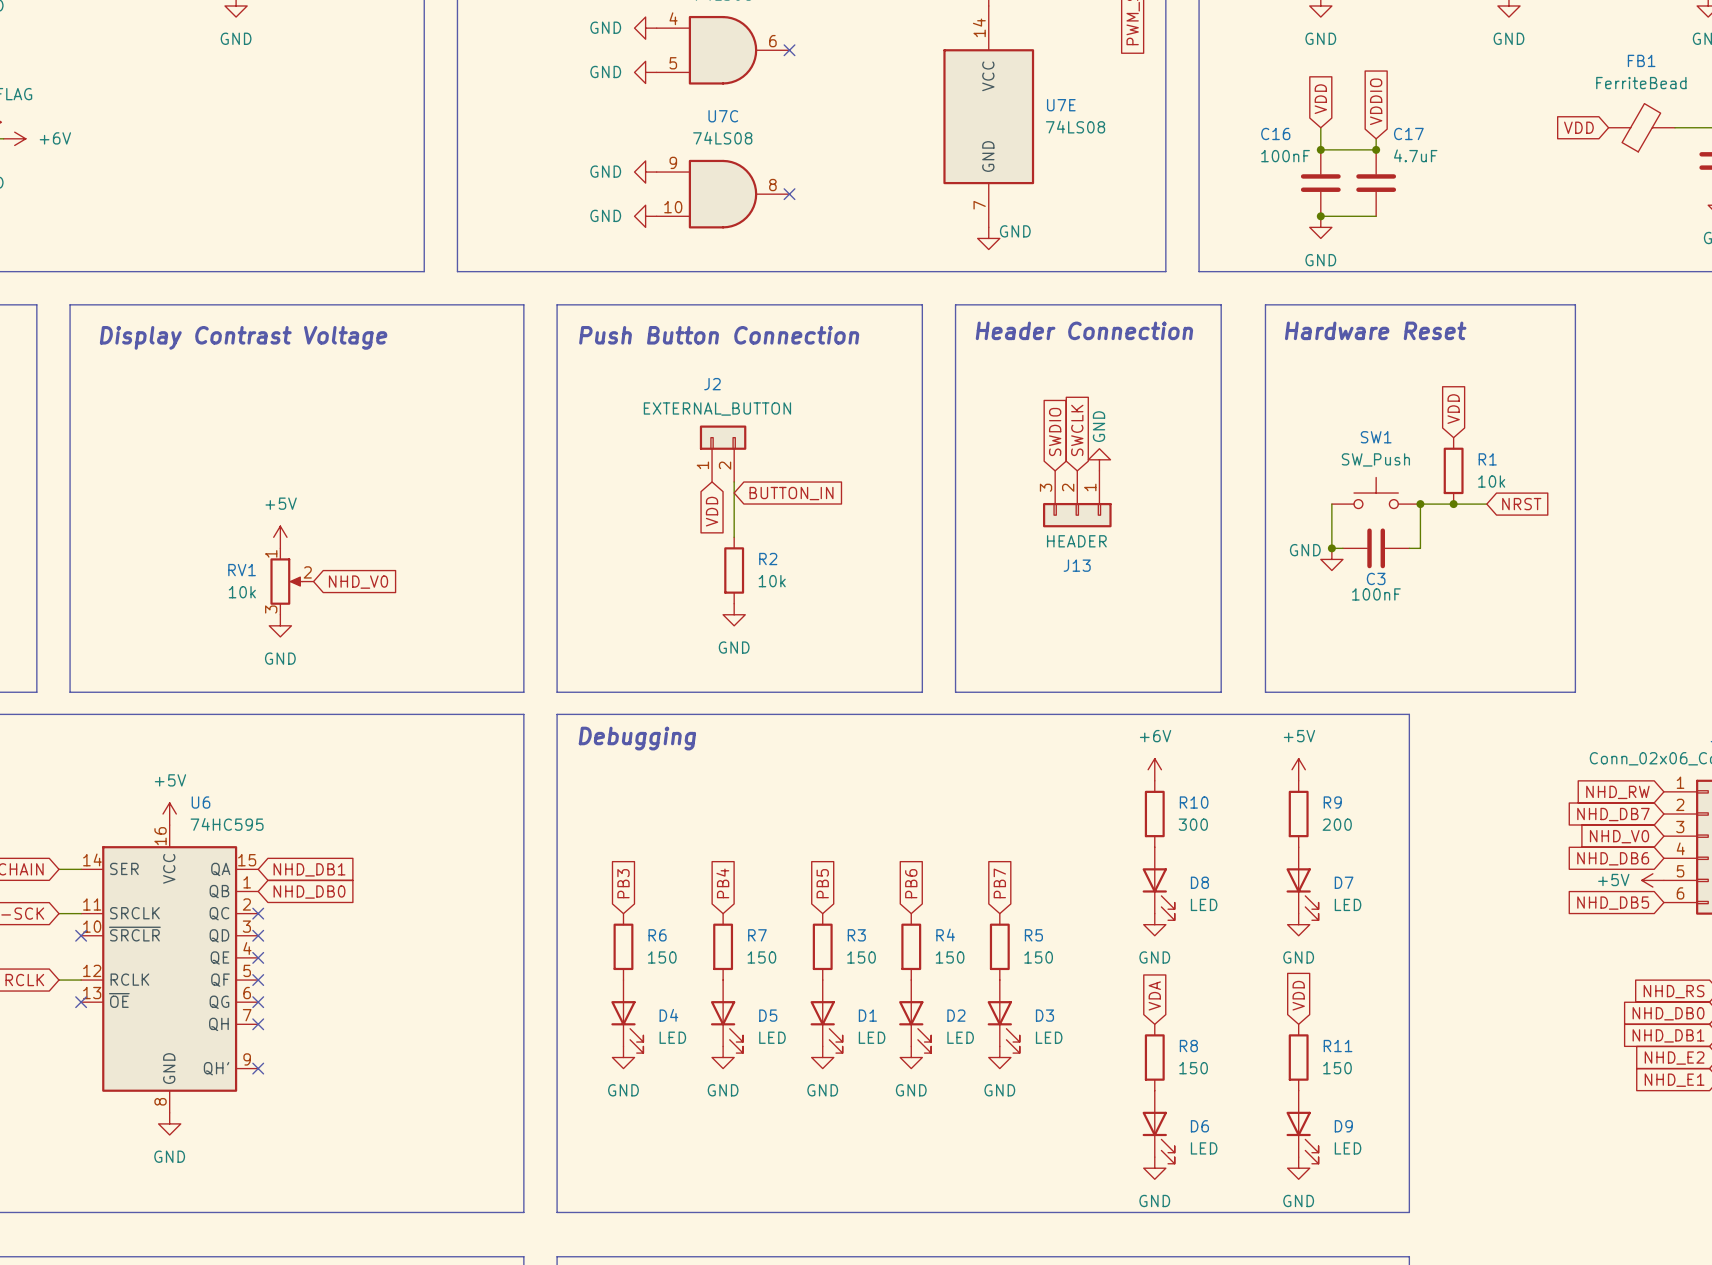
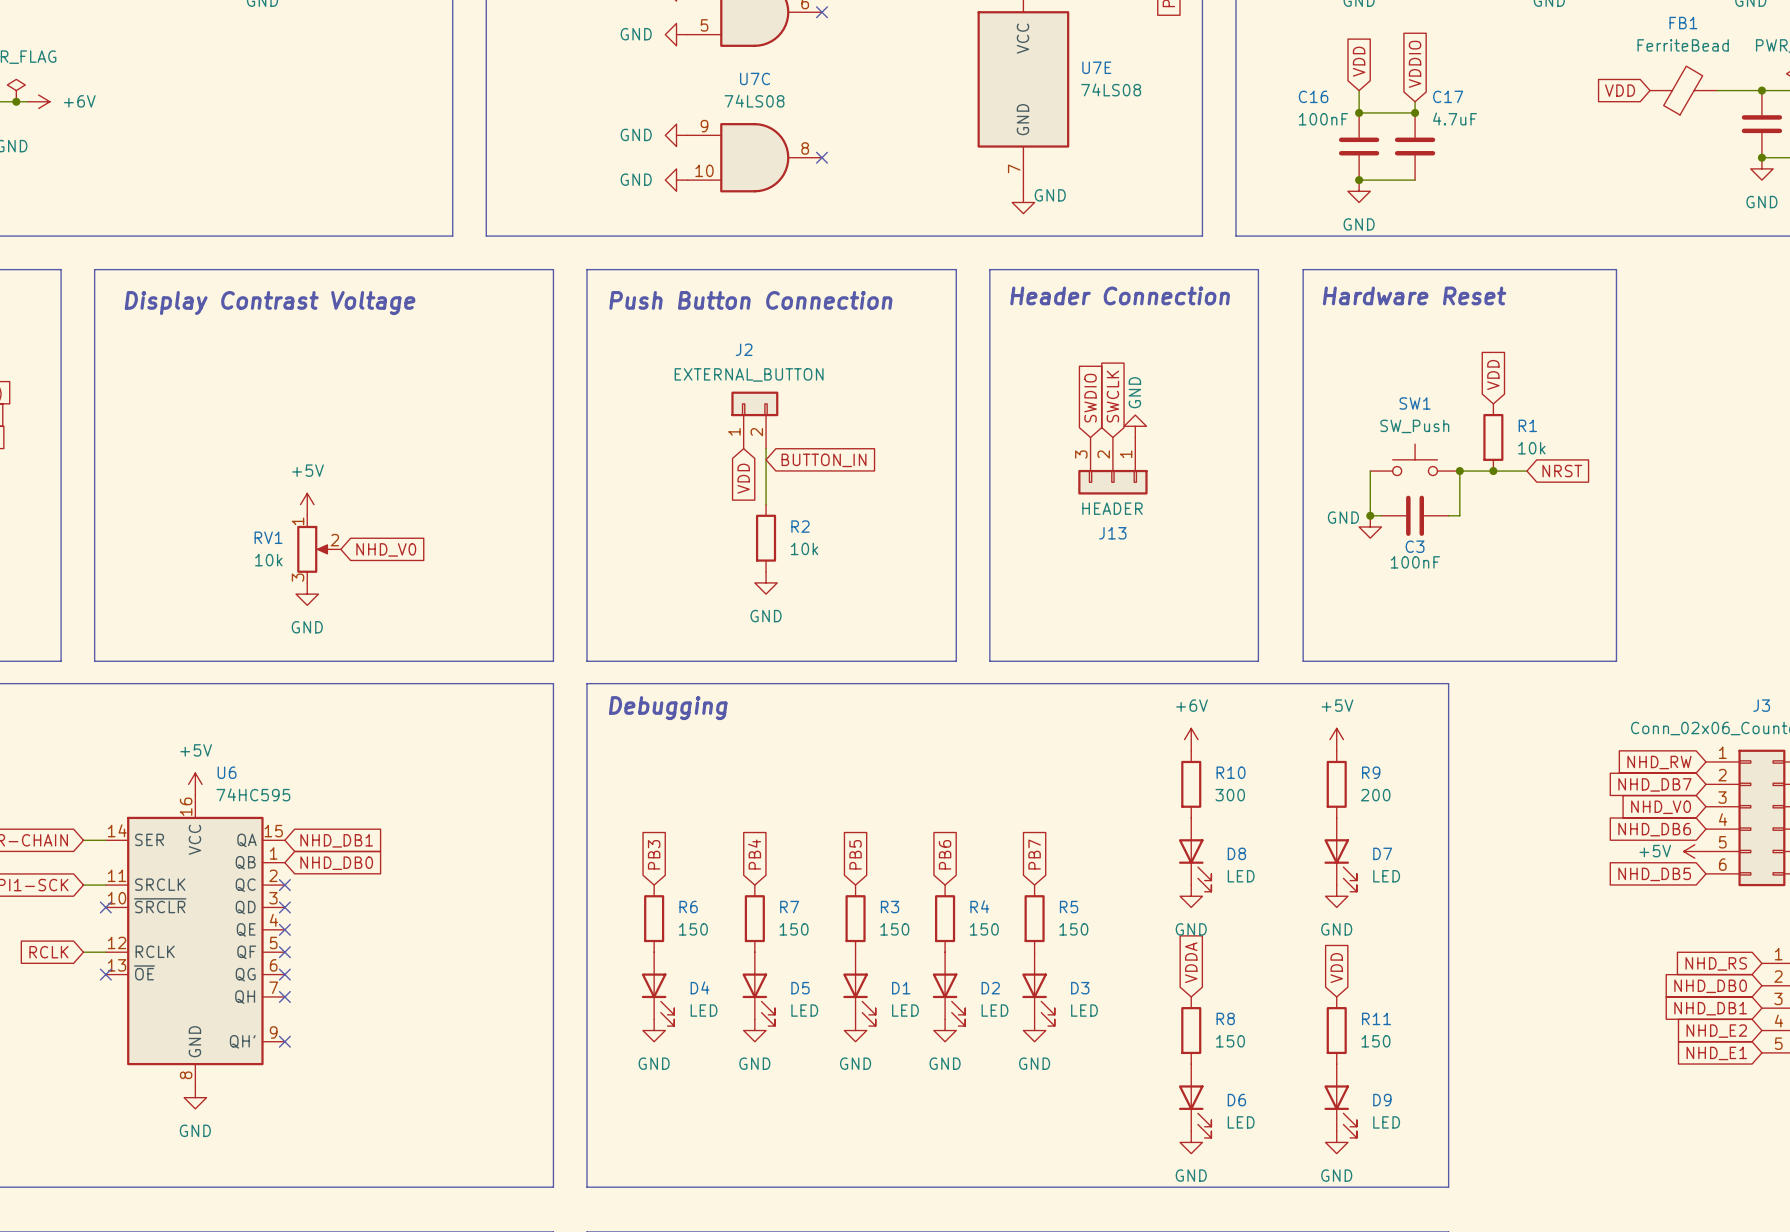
global label: VDA (1154, 995) -> VDDA (1191, 962)

